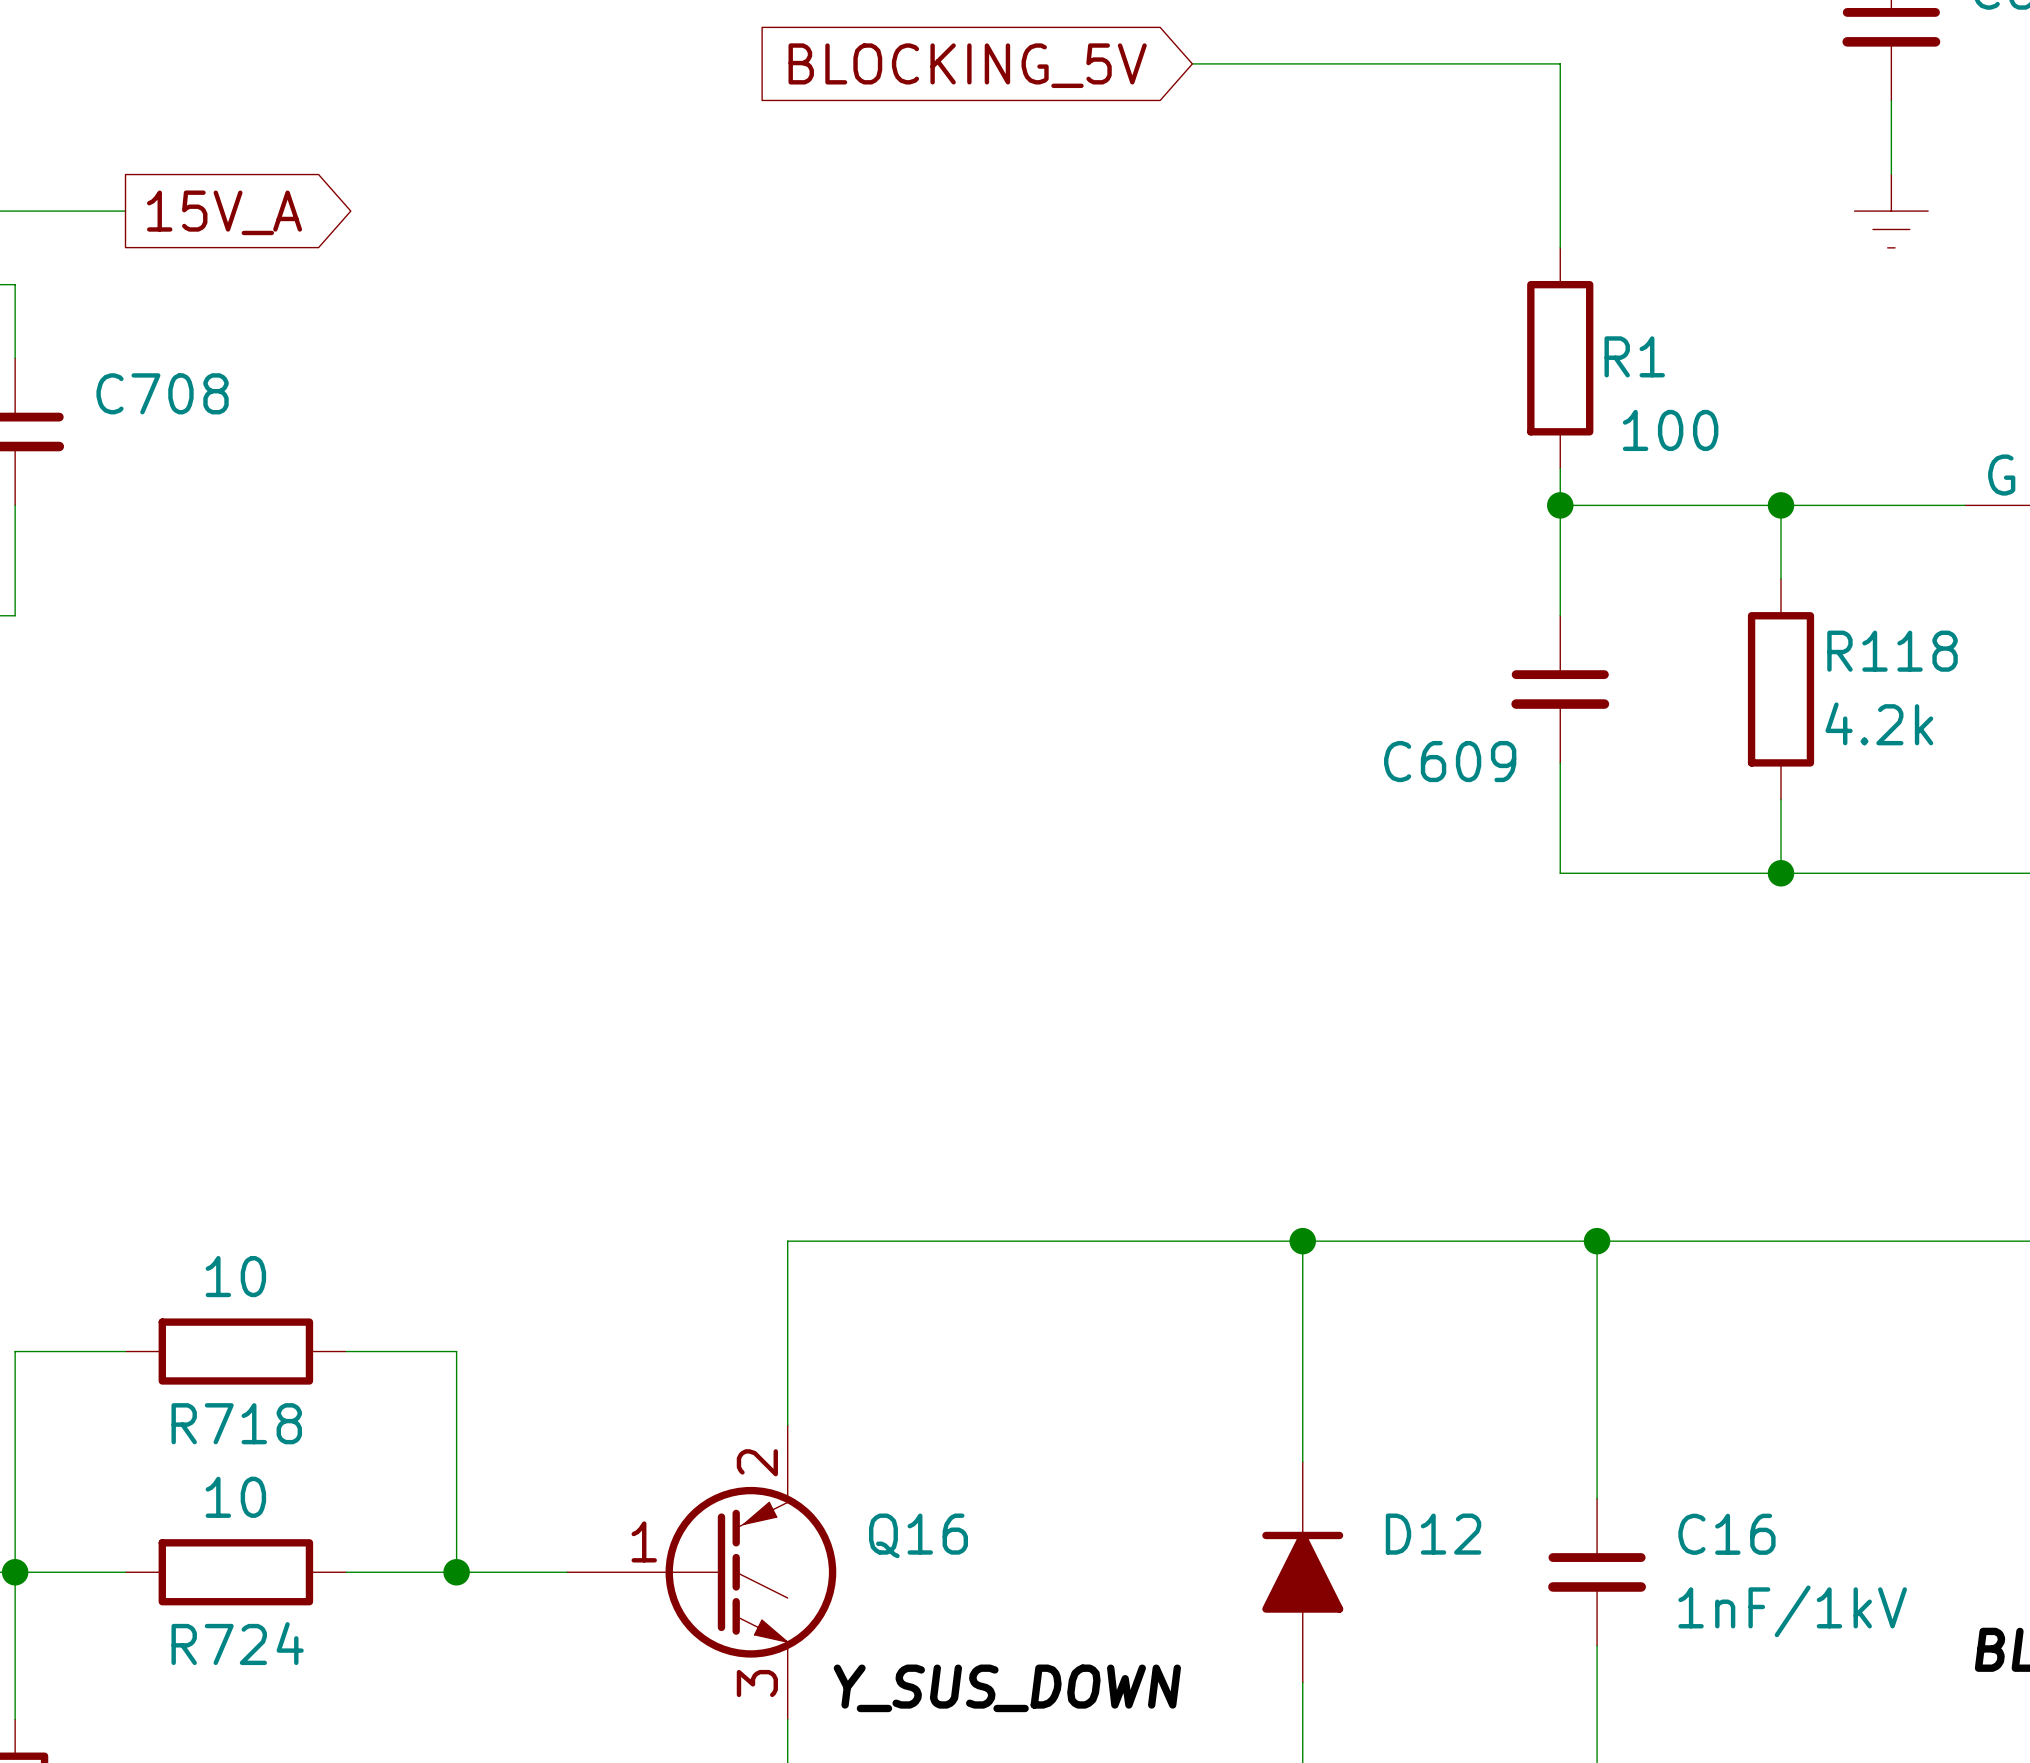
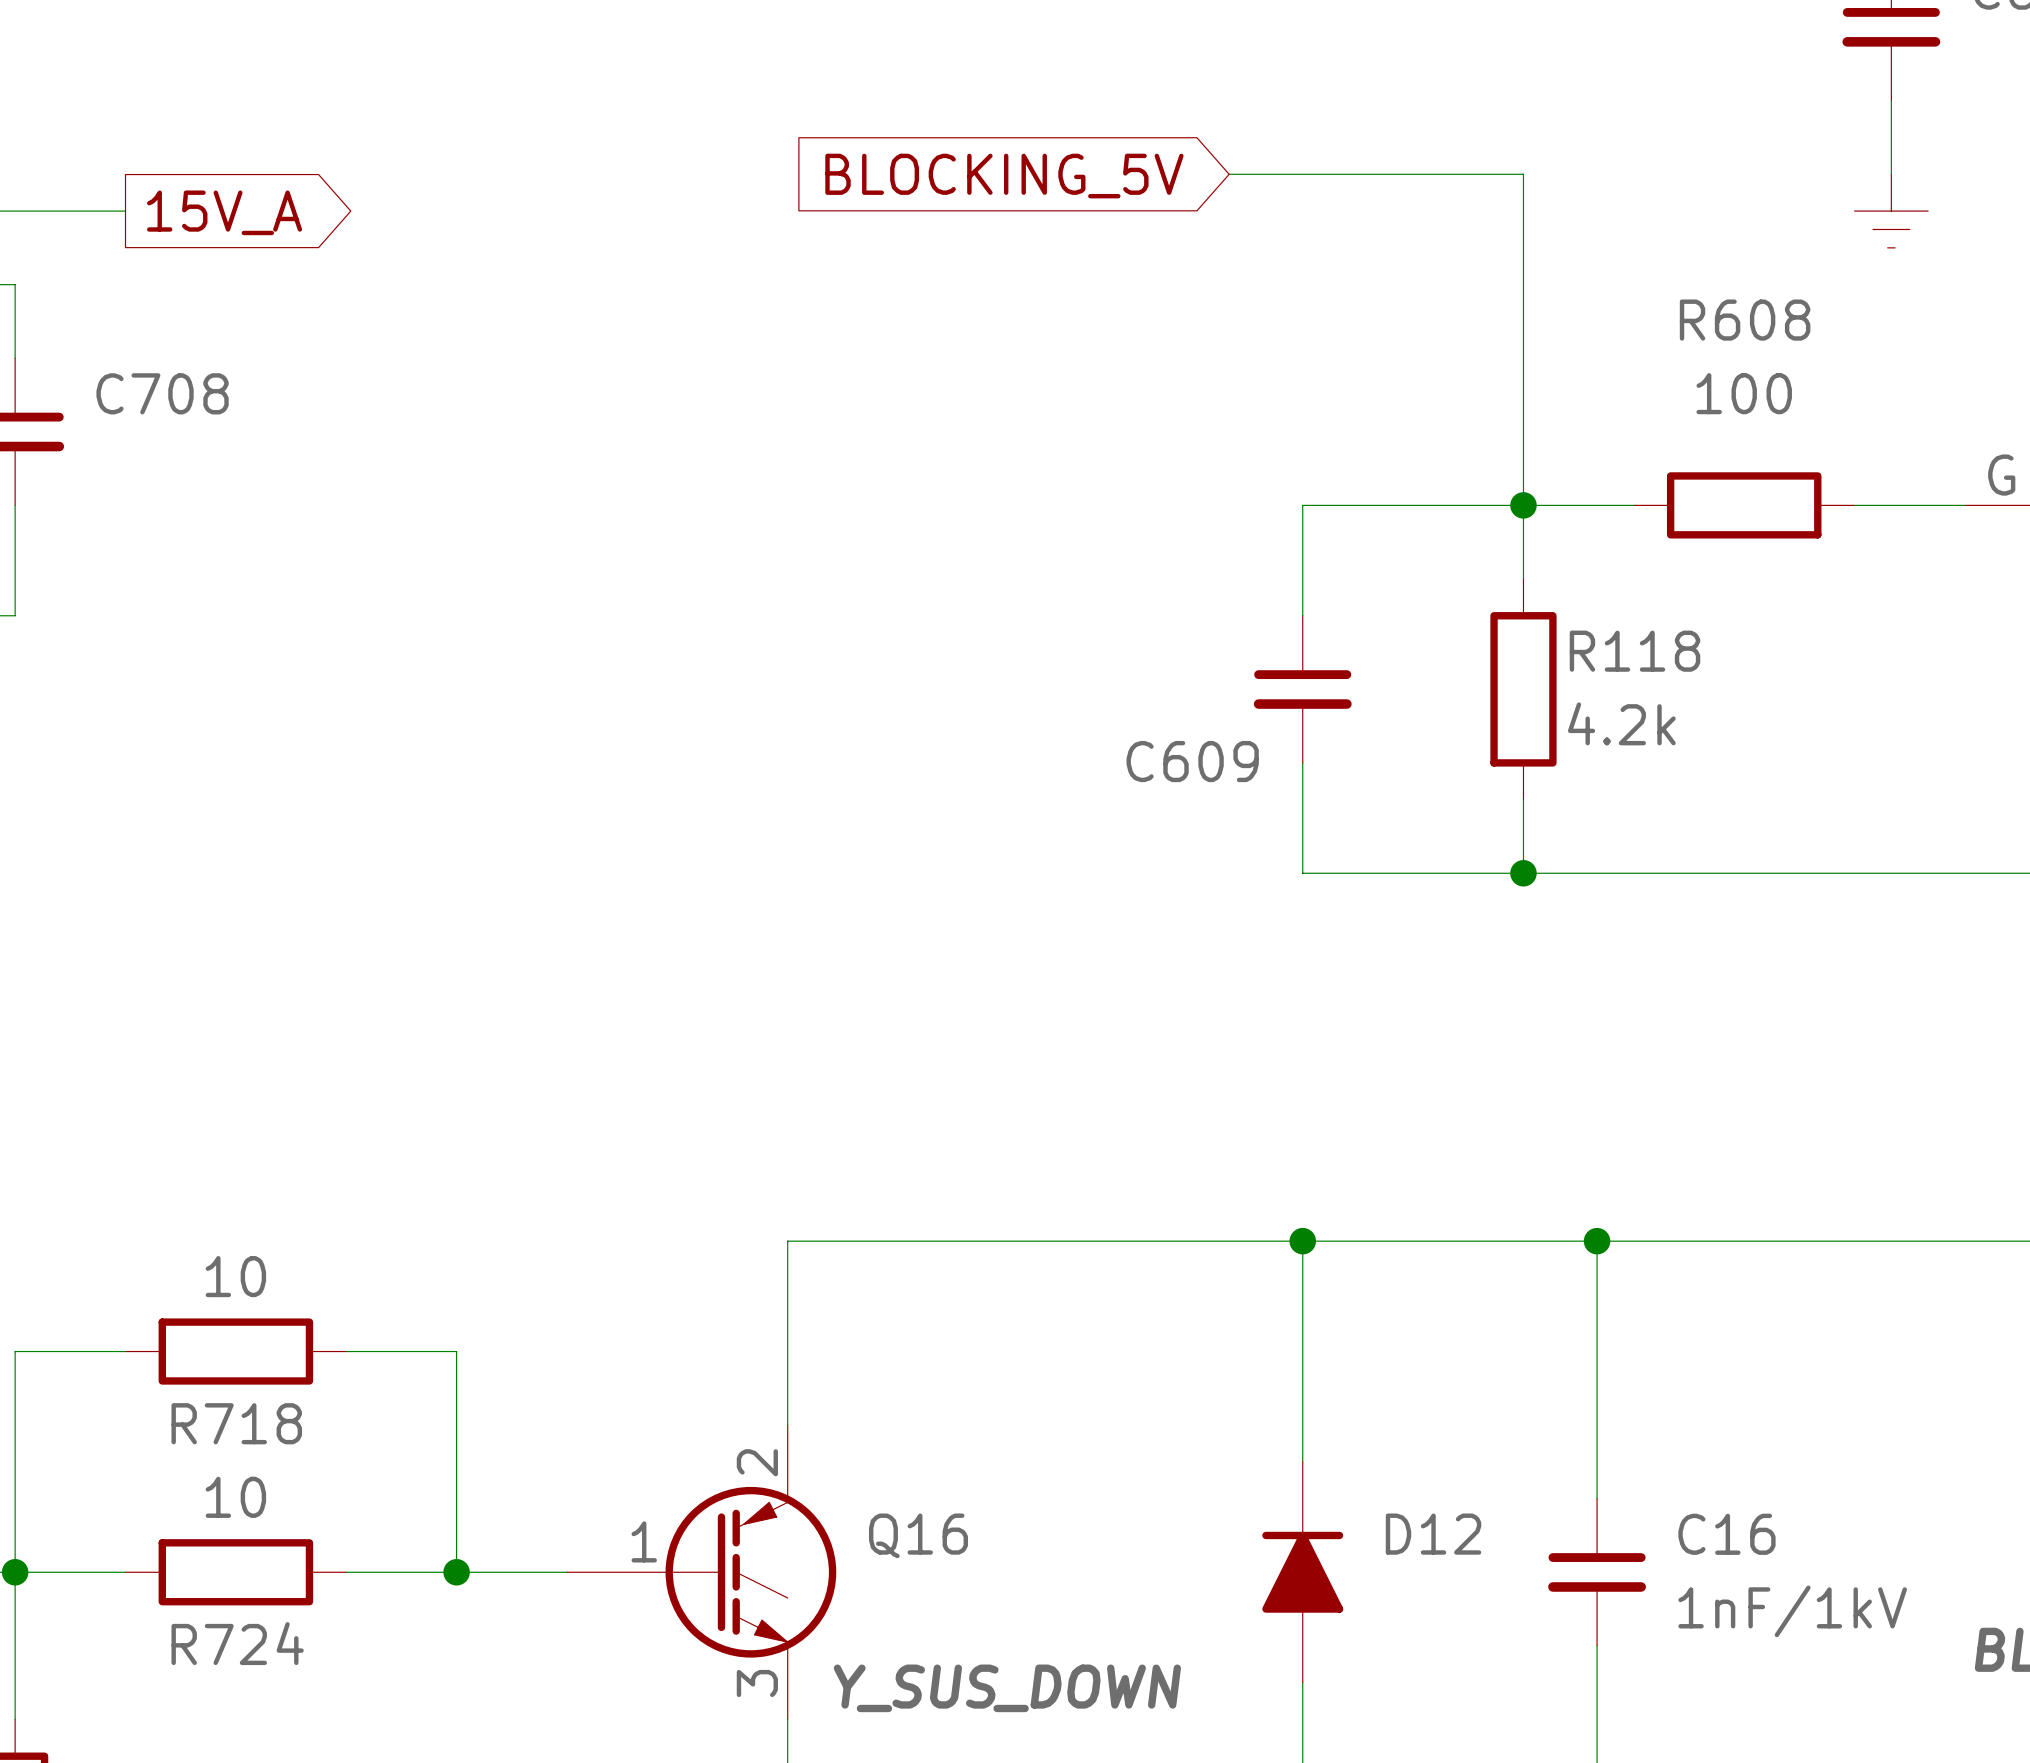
wire: (1192, 63) (1560, 63) (1560, 247) -> none
global label position: BLOCKING_5V (967, 65) -> BLOCKING_5V (1004, 176)
wire: none -> (1229, 174) (1523, 174) (1523, 578)
R1: 100 (1560, 358) -> none
wire: (1560, 468) (1560, 615) -> none
wire: none -> (1560, 505) (1302, 505) (1302, 615)
junction position: (1560, 505) -> (1523, 505)
wire: (1633, 505) (1854, 505) -> none
R608: none -> 100 (1744, 505)
wire: (1780, 505) (1780, 578) -> none
junction: (1780, 505) -> none
C609 position: (1560, 689) -> (1302, 689)
R118 position: (1780, 689) -> (1523, 689)
wire: (1560, 762) (1560, 873) -> (1302, 762) (1302, 873) (1560, 873)
wire: (1780, 799) (1780, 873) -> (1523, 799) (1523, 873)
junction: none -> (1523, 873)
junction: (1780, 873) -> none

